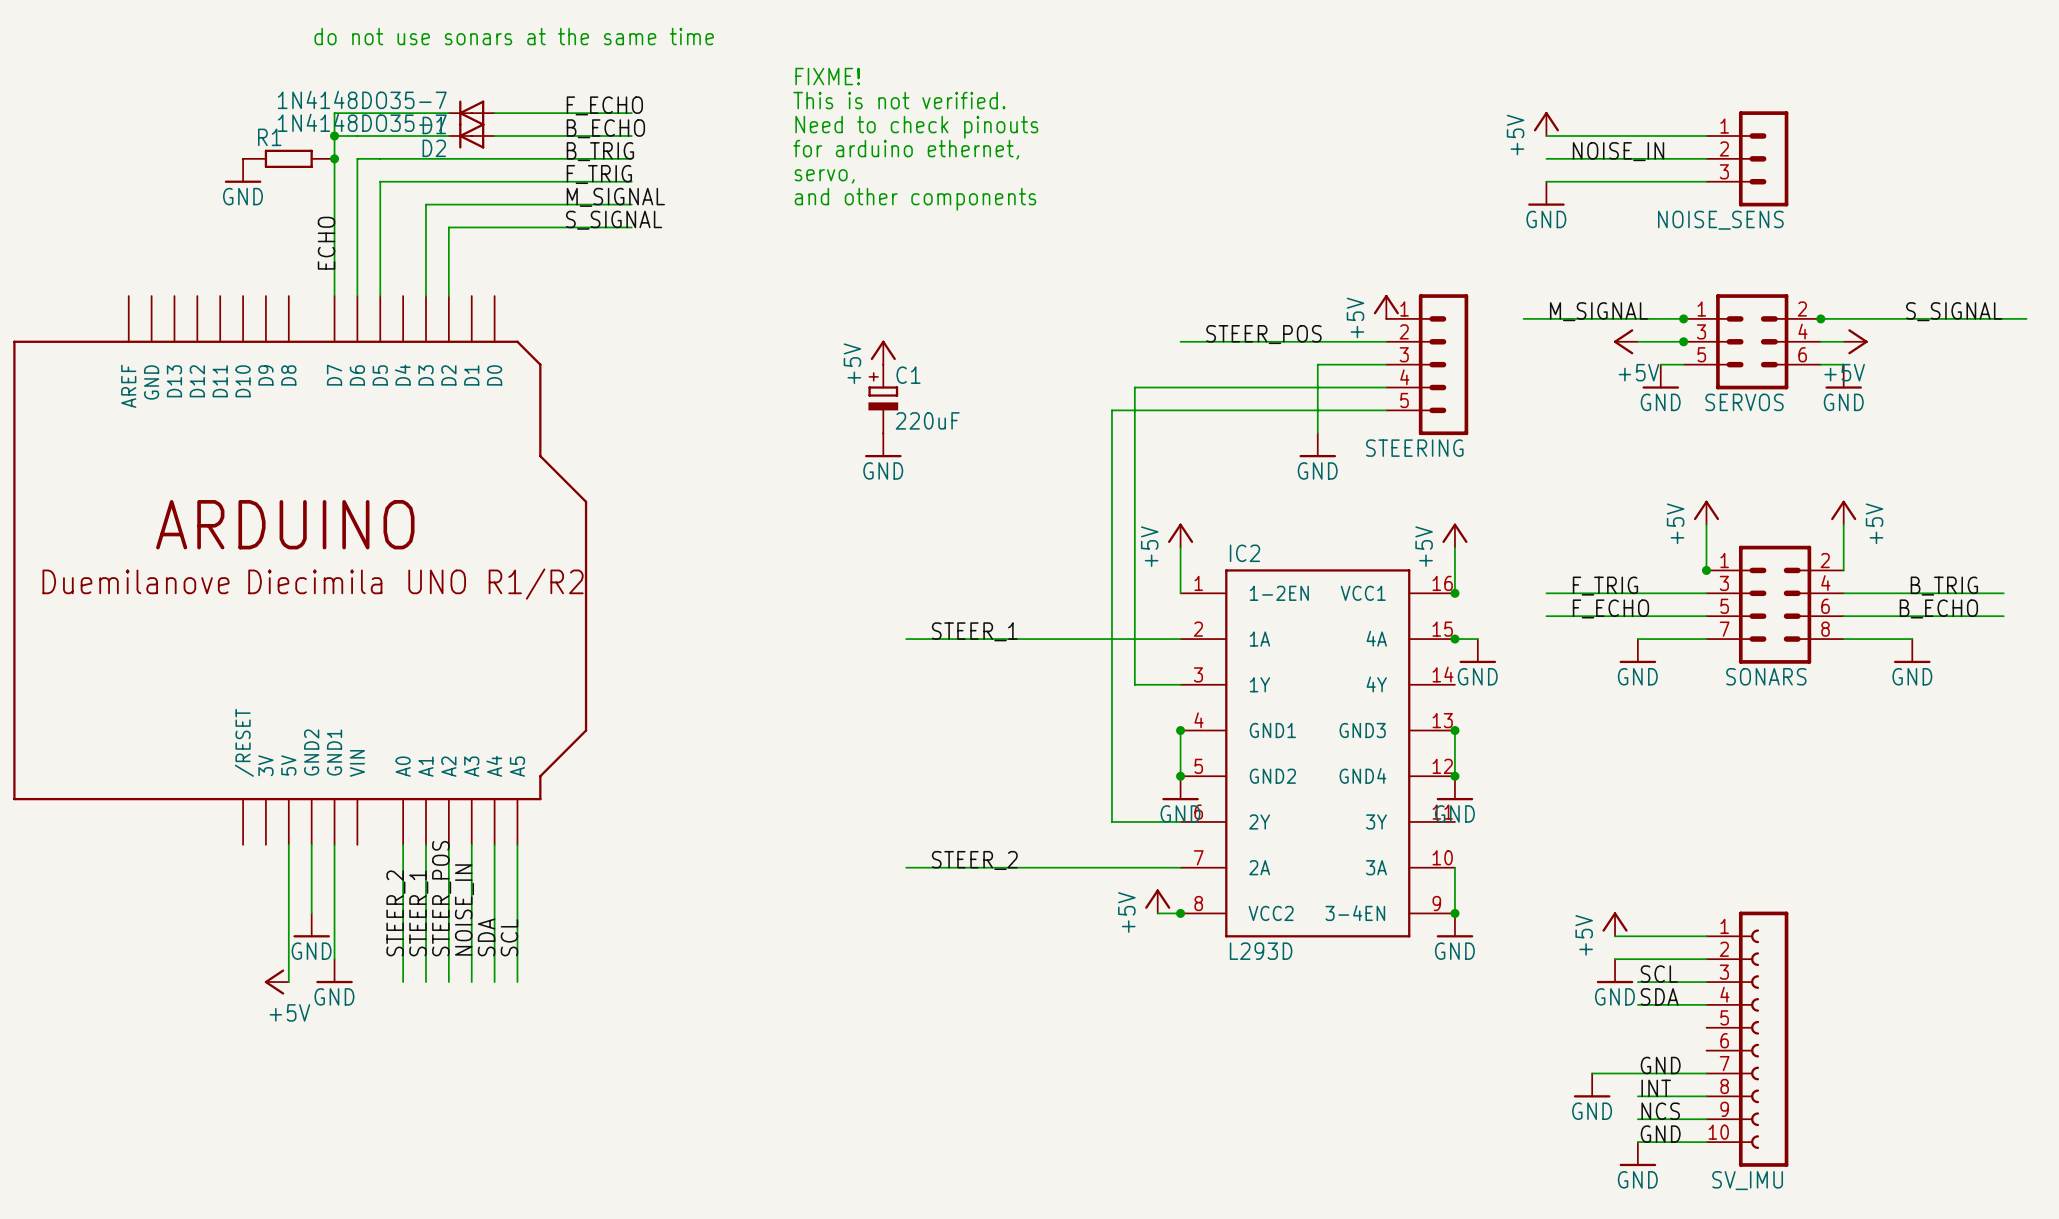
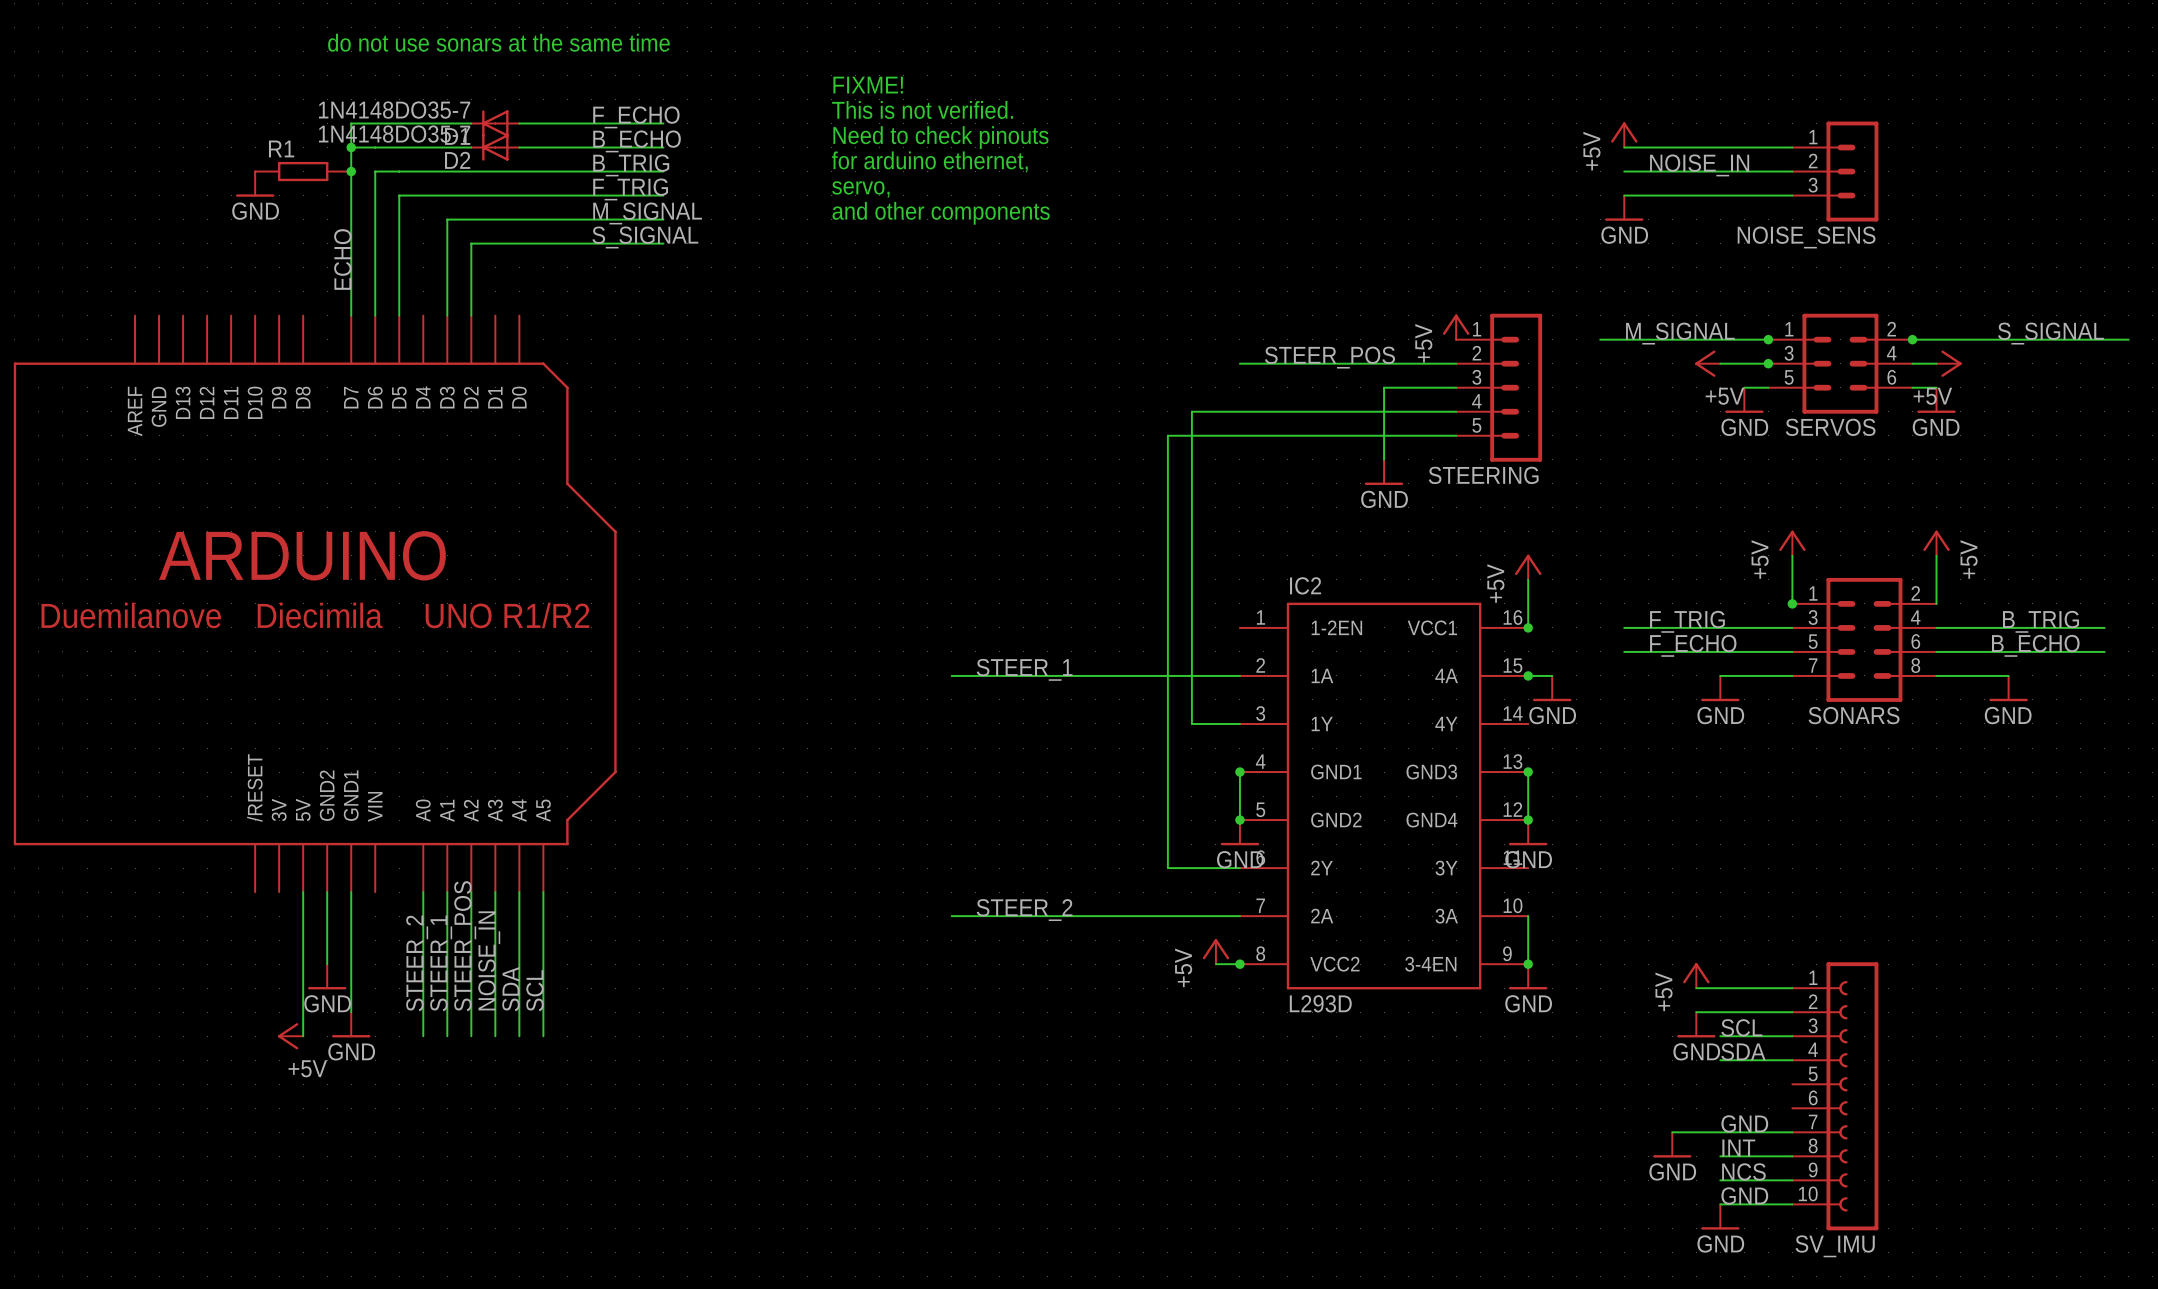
power symbol: +5V (883, 352) -> none
C1: 220uF (883, 398) -> none
power symbol: GND (883, 445) -> none
power symbol: +5V (1180, 535) -> none
wire: (1180, 547) (1180, 593) -> none

